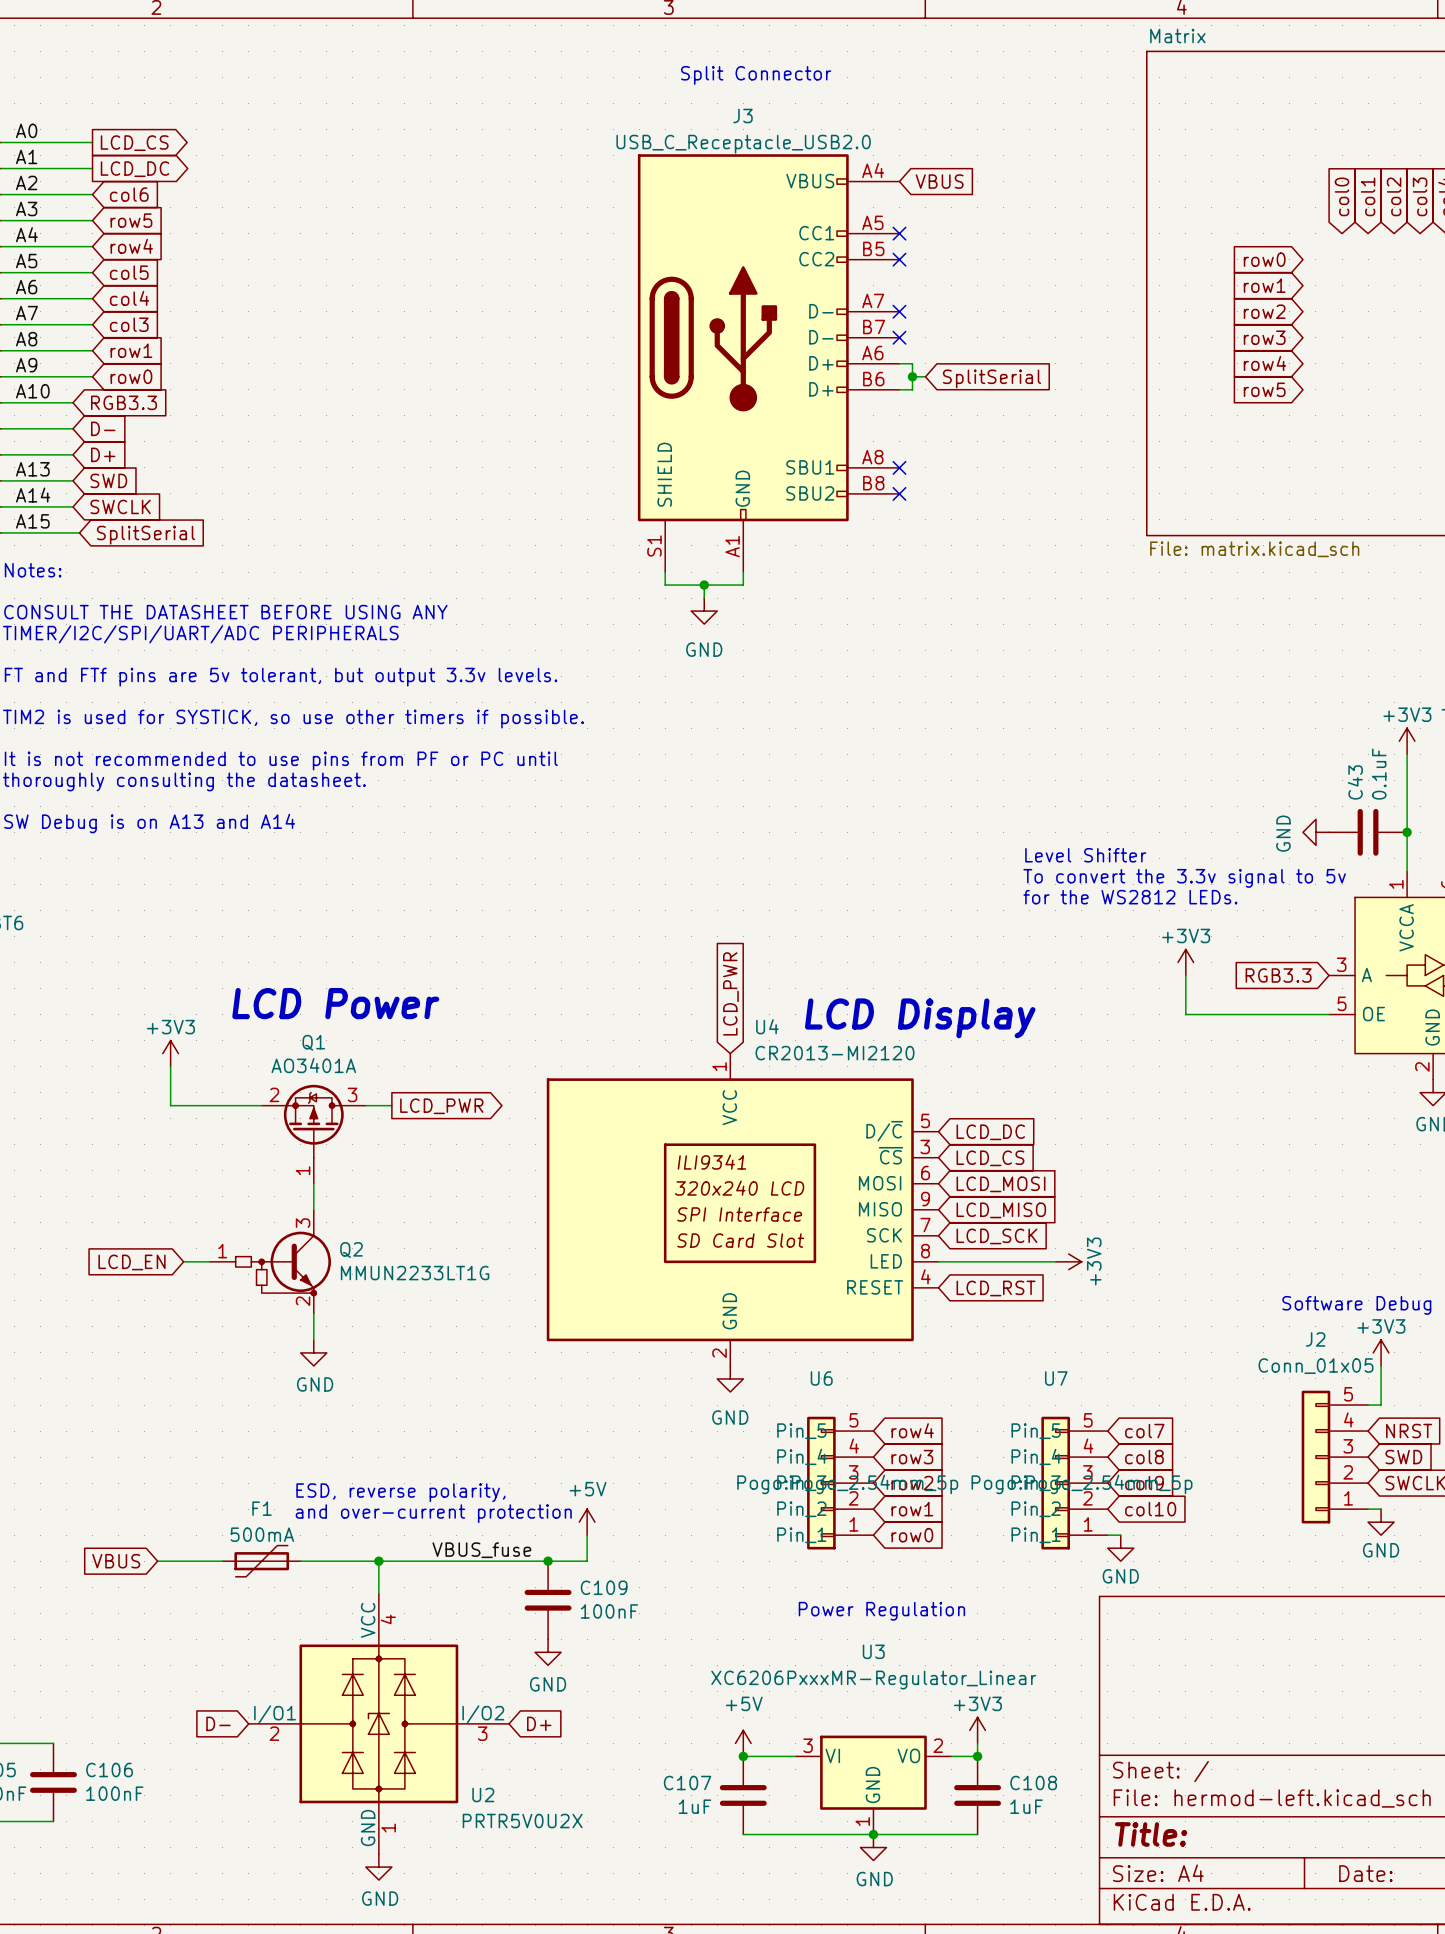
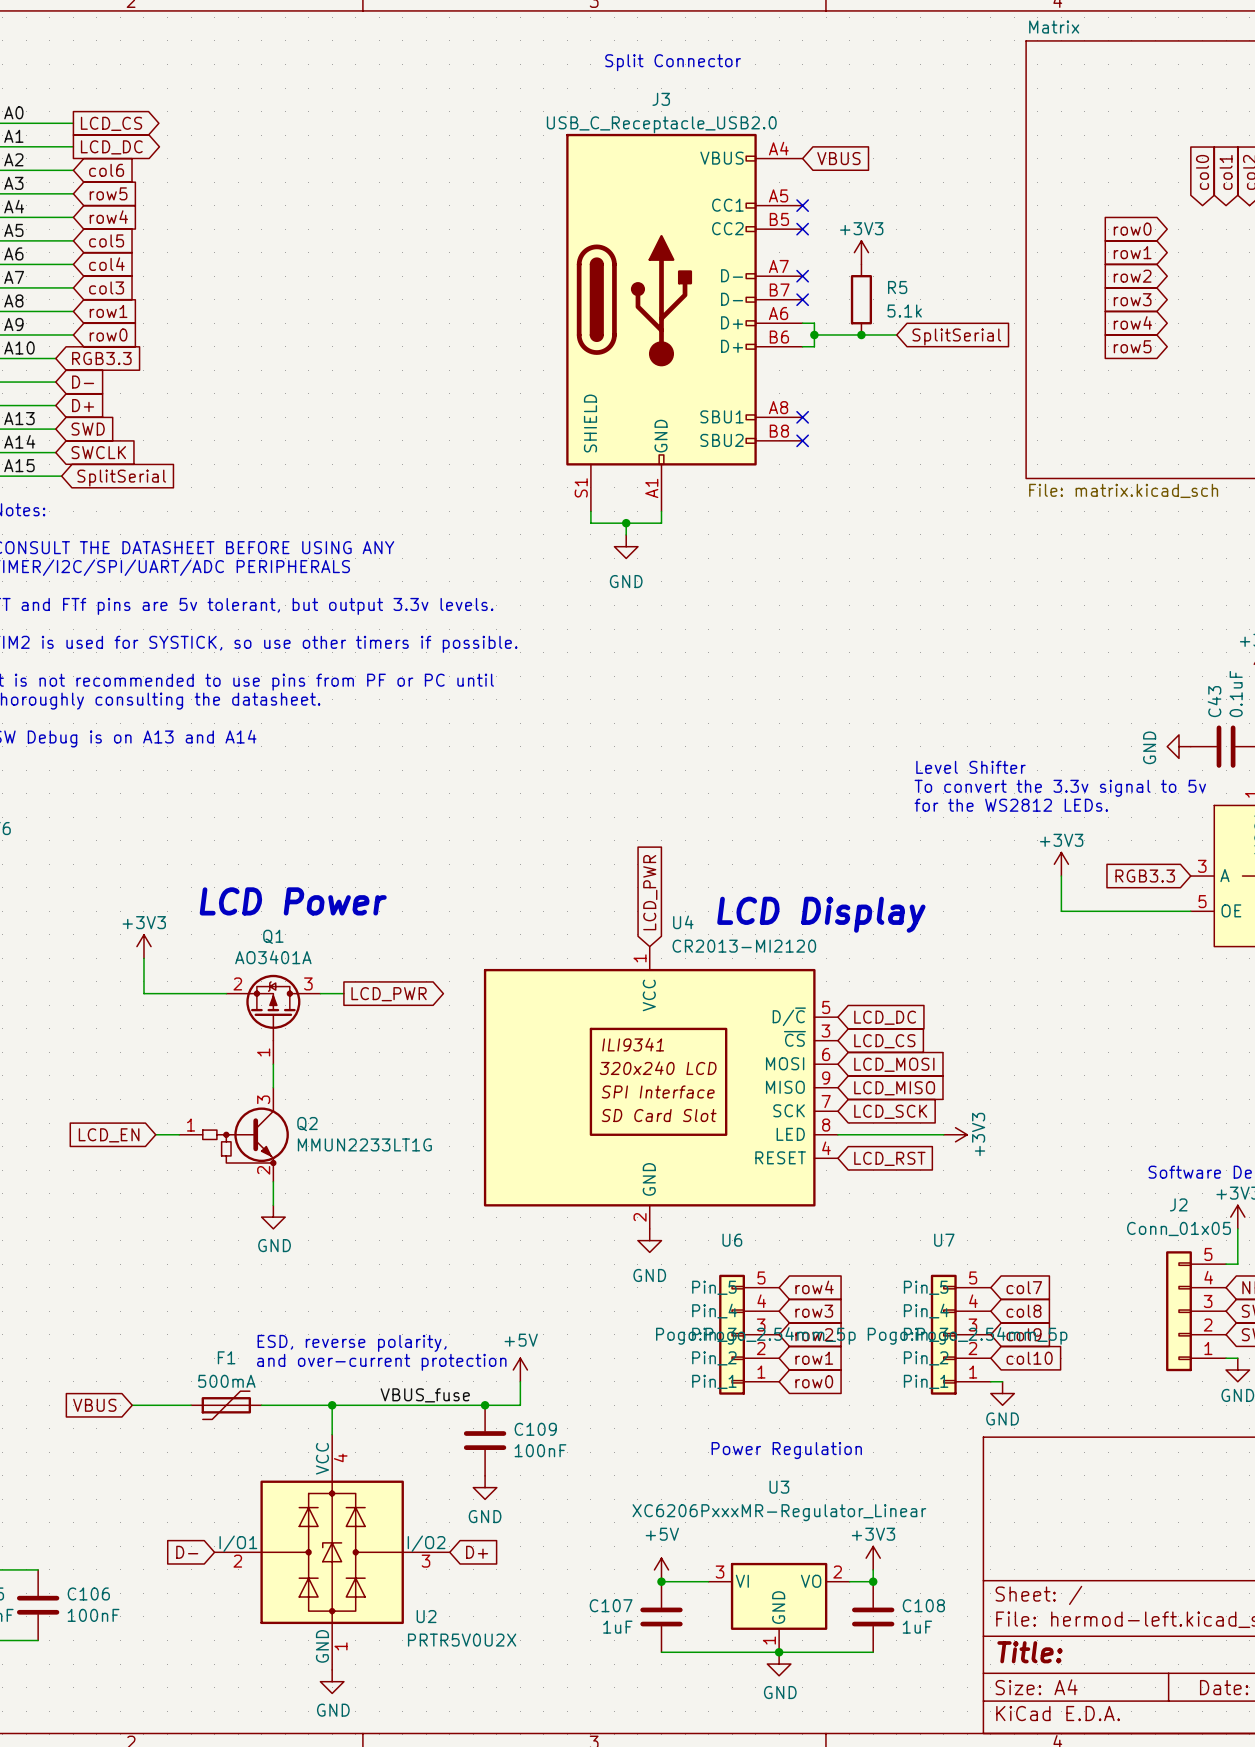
power symbol: none -> +3V3 (861, 252)
R5: none -> 5.1k (861, 299)
wire: none -> (826, 334) (896, 334)
junction: none -> (861, 334)
global label position: SplitSerial (992, 378) -> SplitSerial (956, 336)

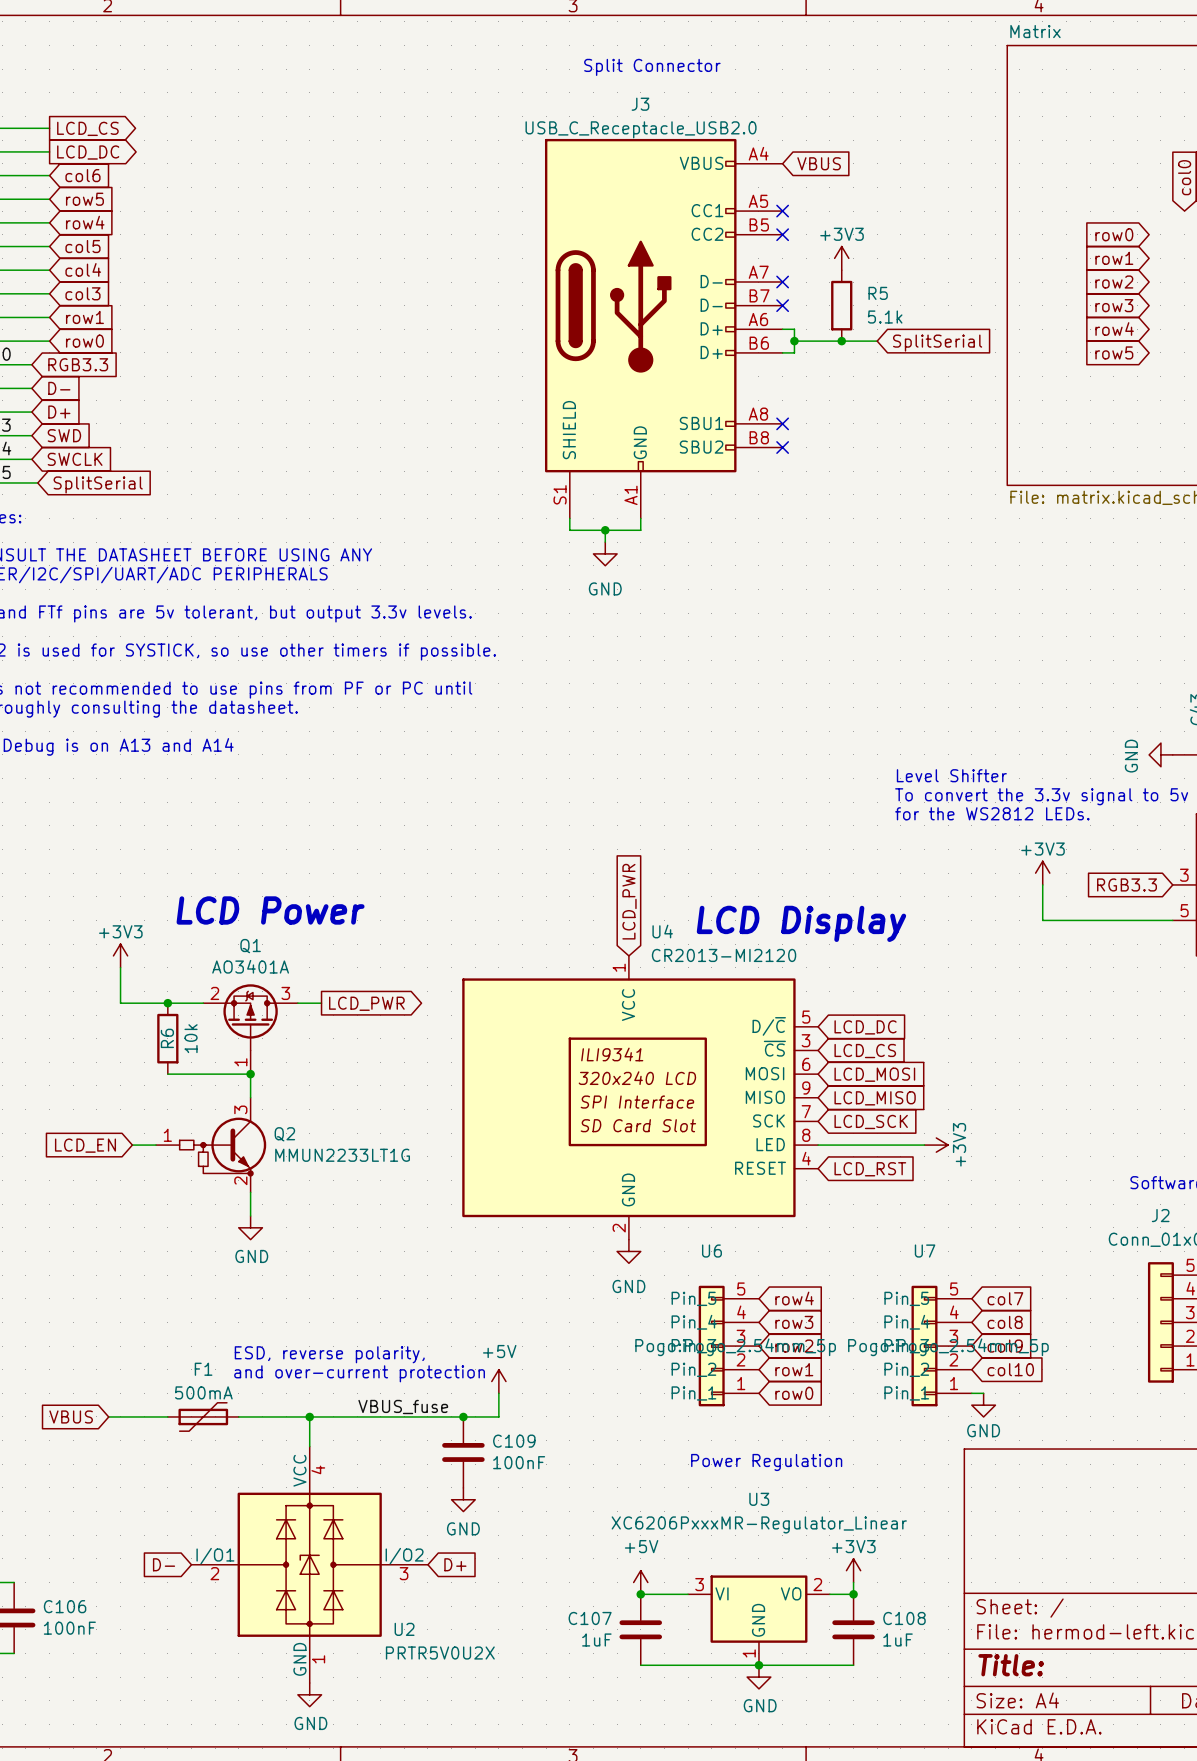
junction: none -> (167, 1003)
R6: none -> 10k (167, 1038)
wire: none -> (167, 1074) (250, 1074)
junction: none -> (250, 1074)

